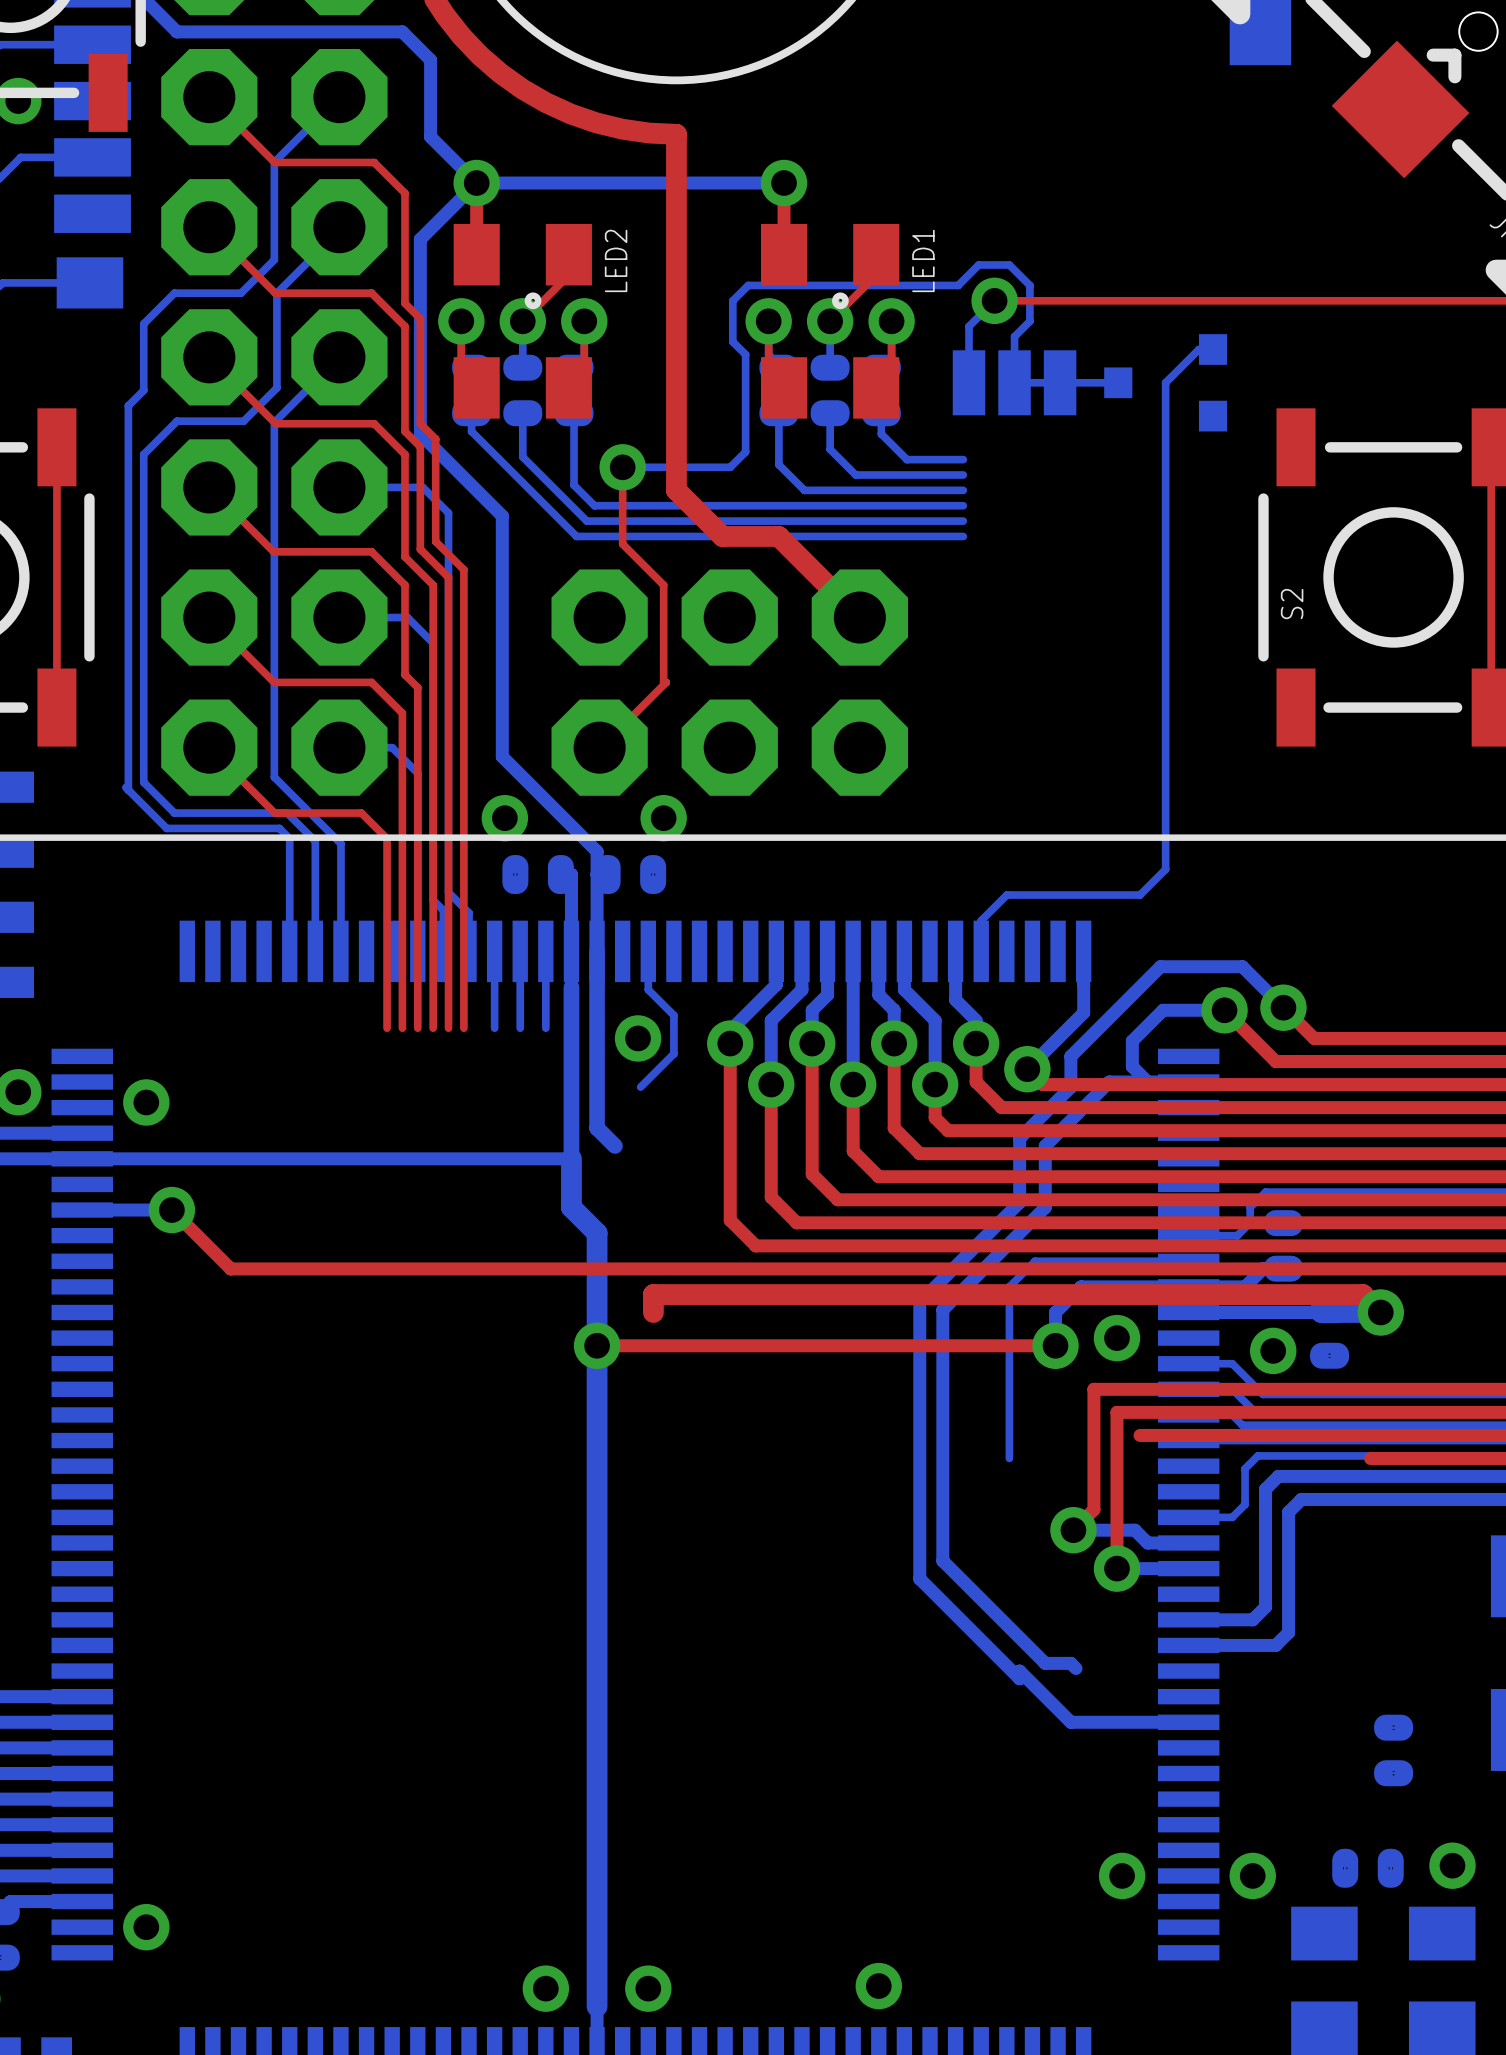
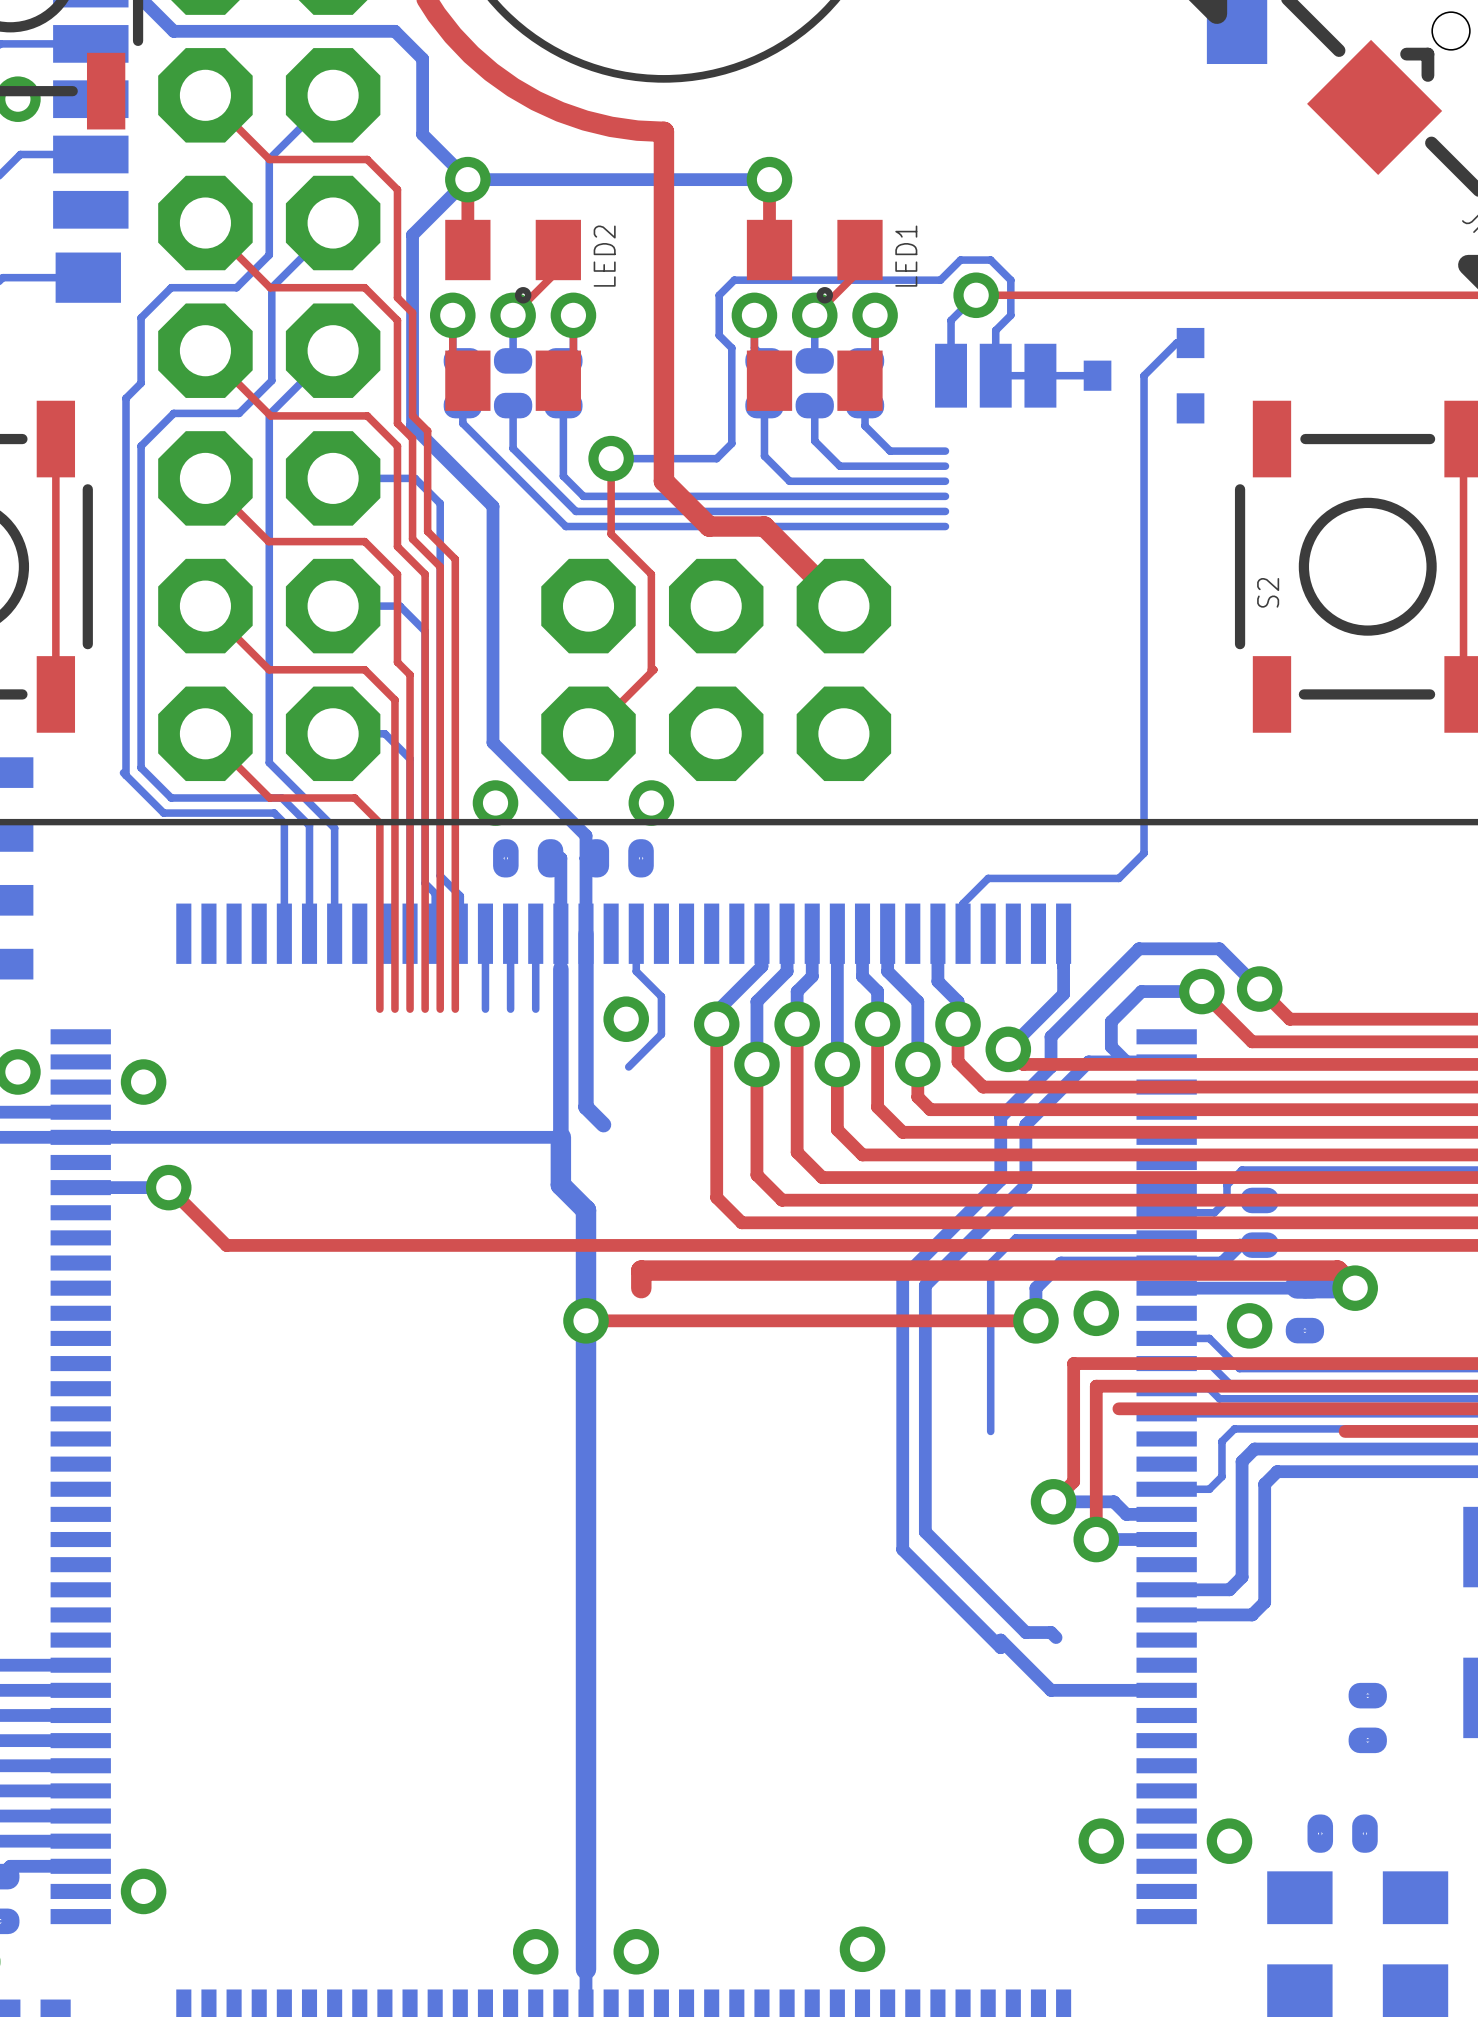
via: (1452, 1865) -> none

